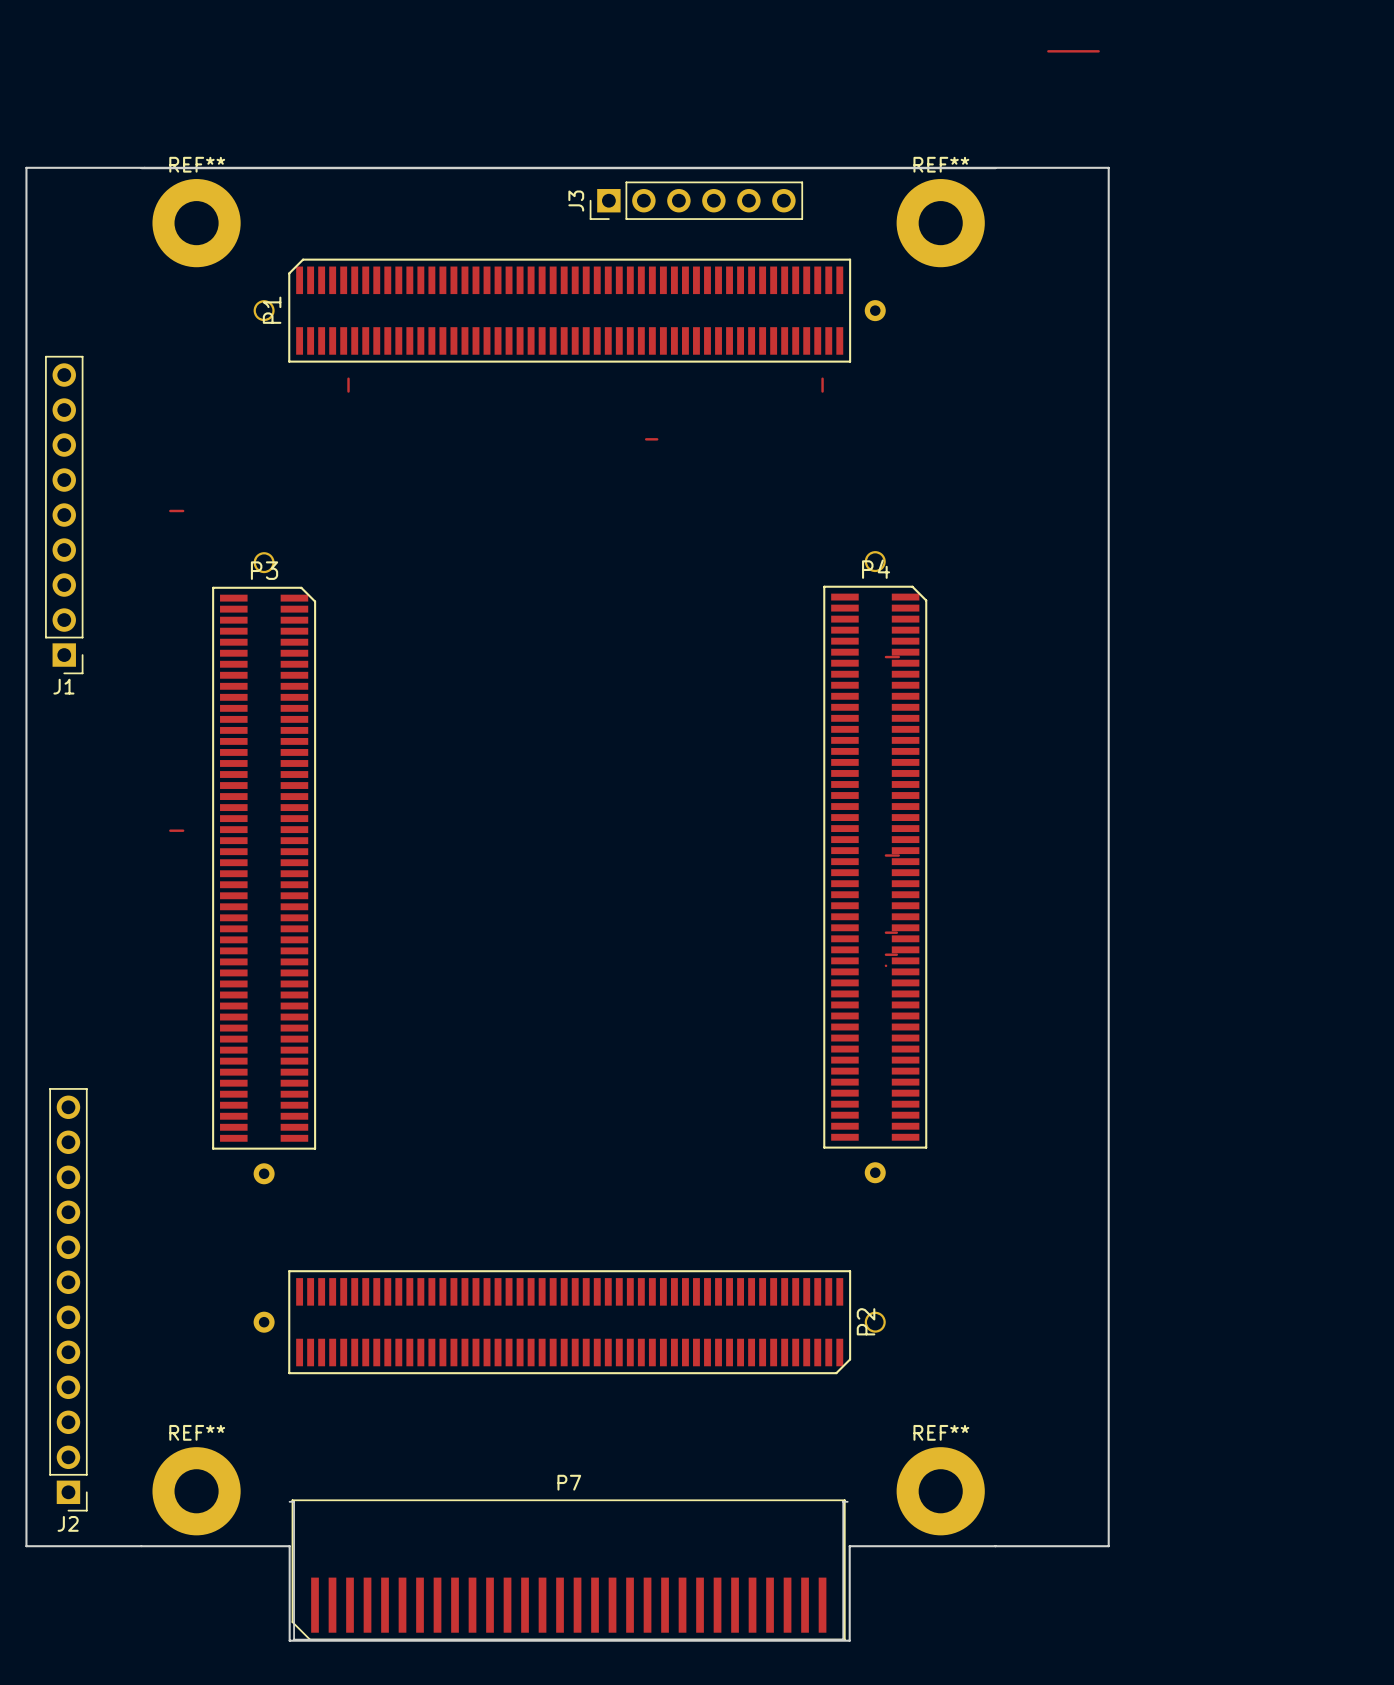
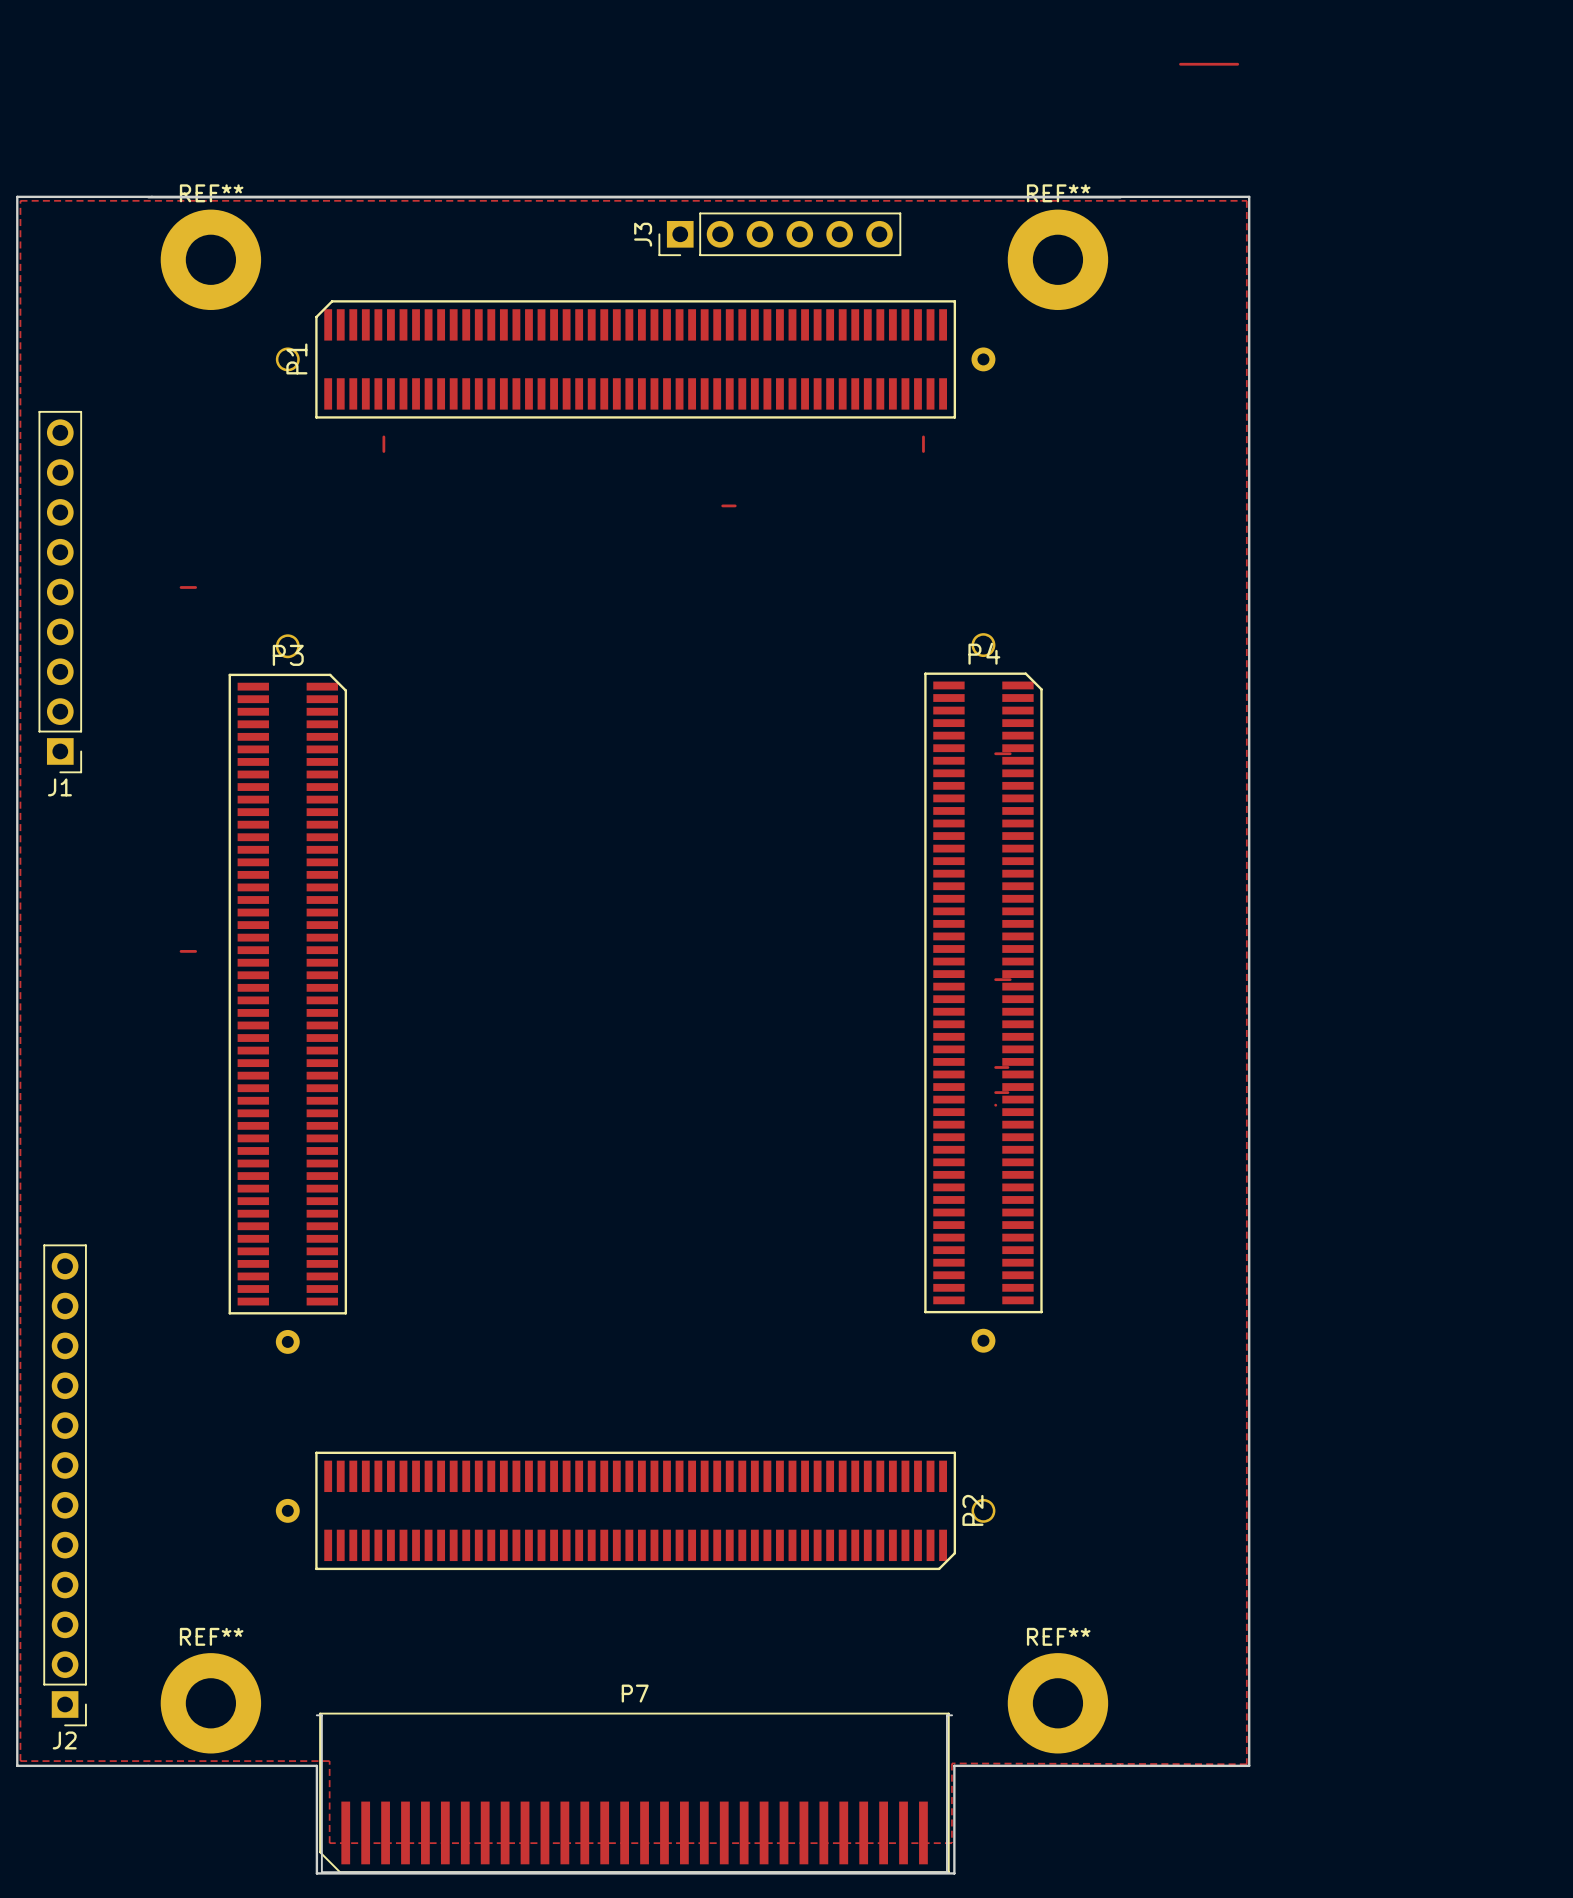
zone outline: none -> (20, 200) (20, 1761) (329, 1761) (329, 1843) (951, 1843) (951, 1763) (1246, 1764) (1246, 200) (20, 200)

